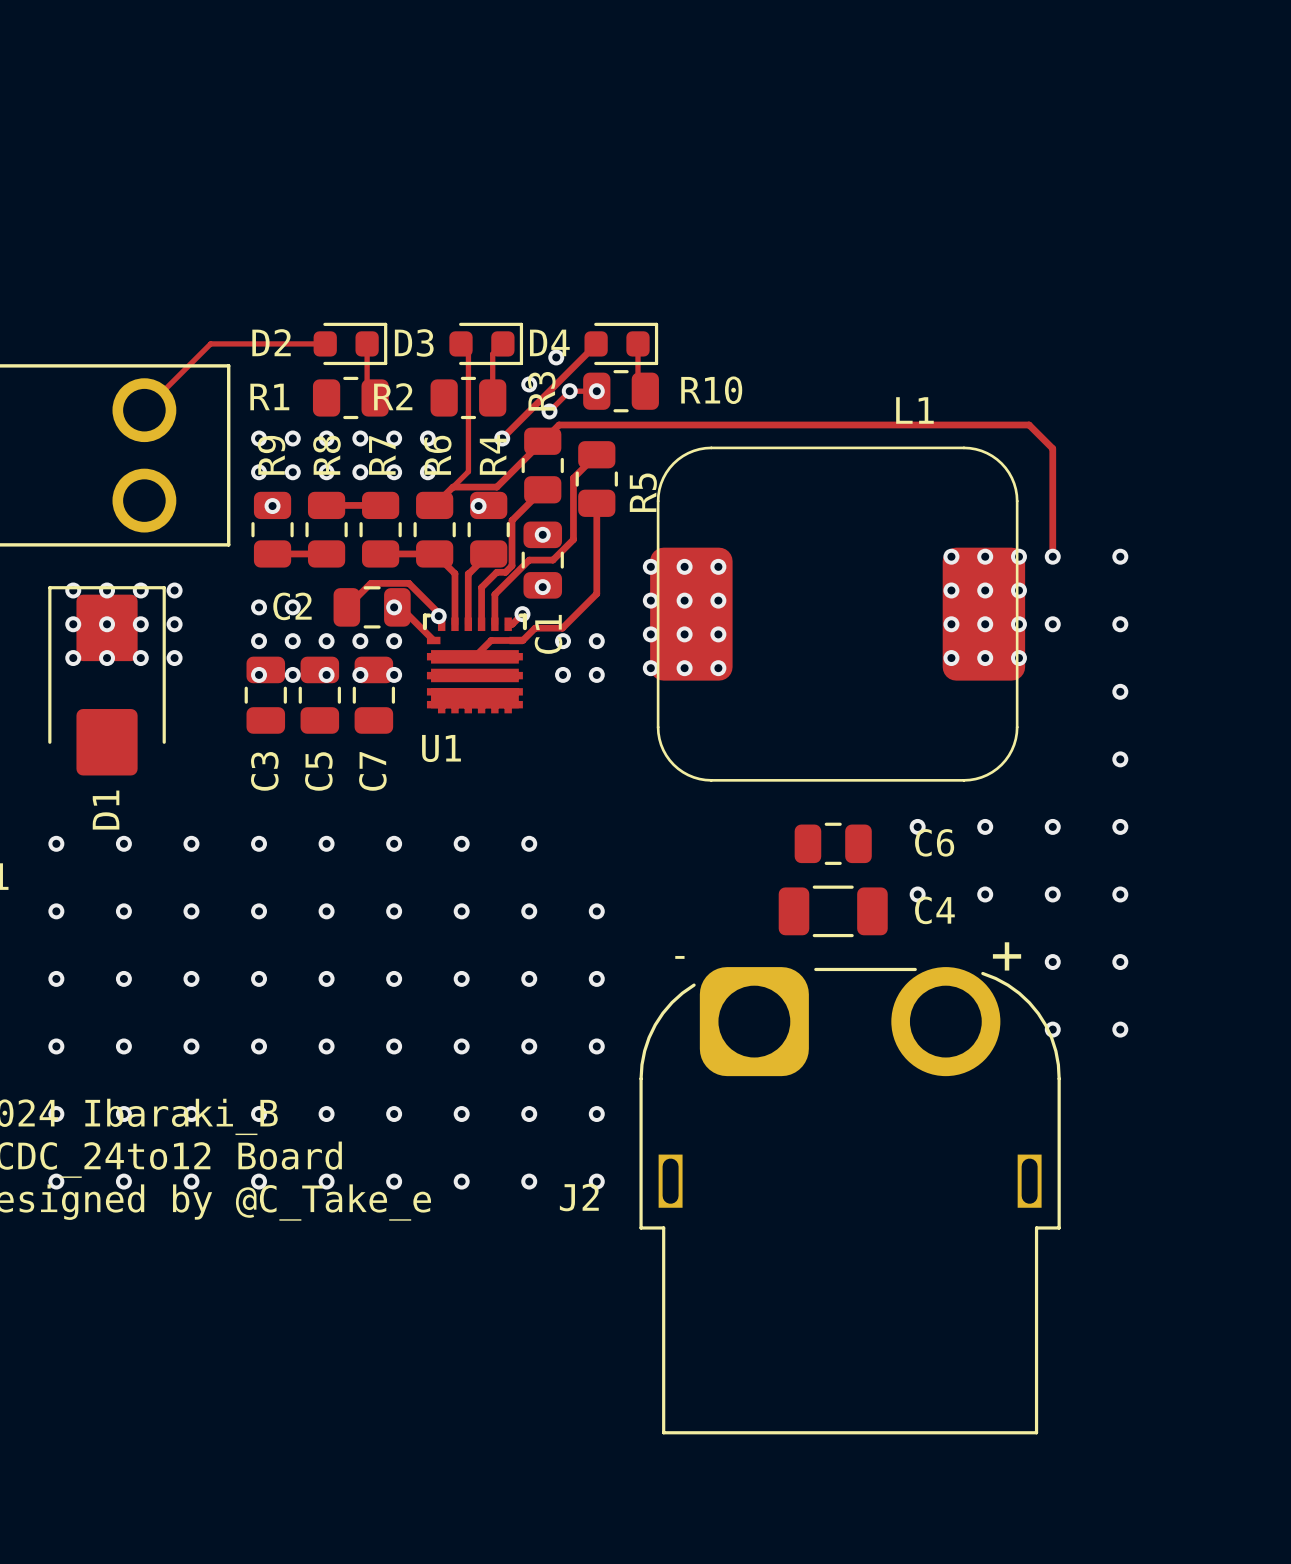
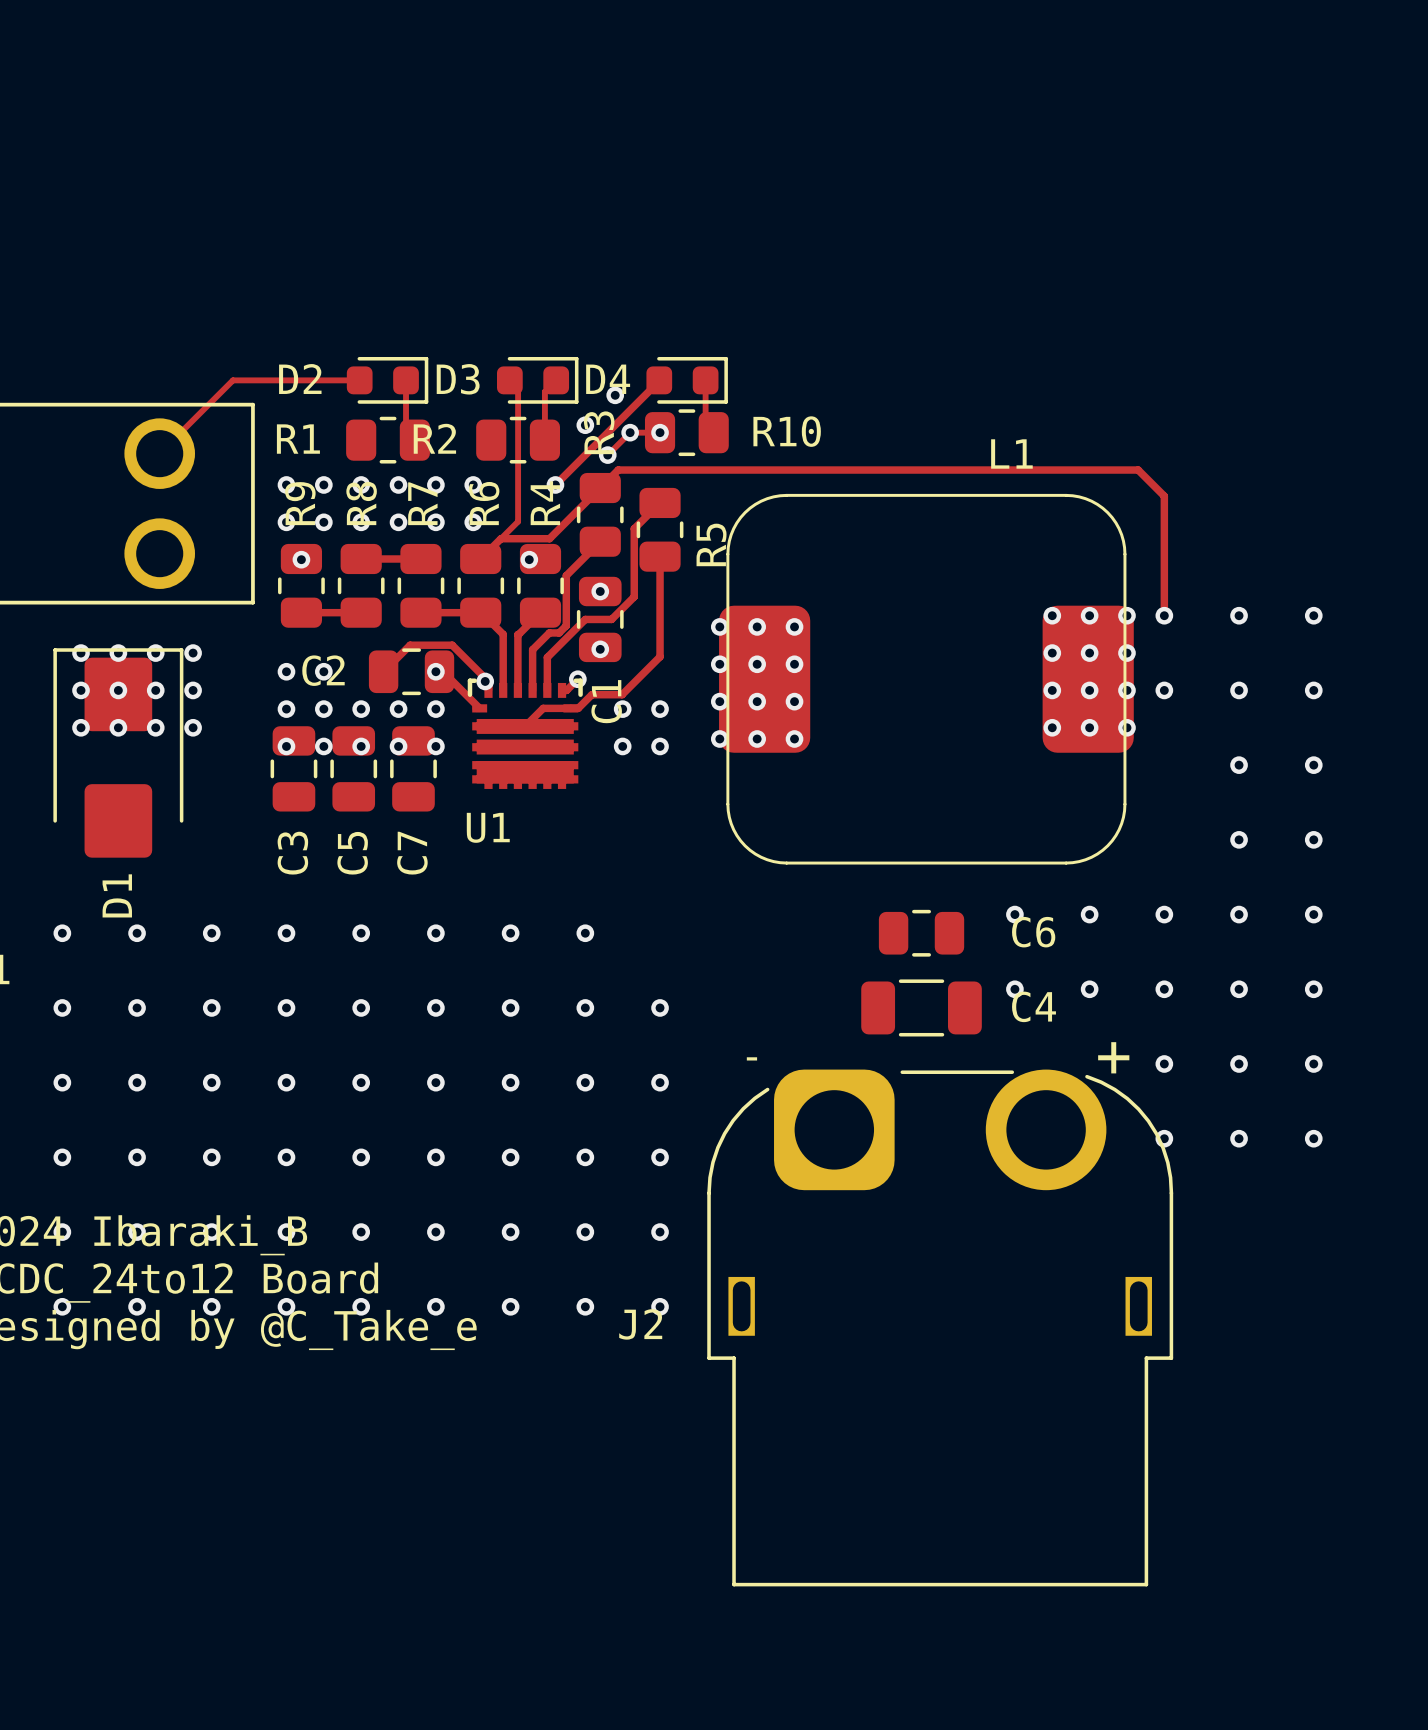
via: none -> (1313, 615)
via: none -> (1313, 690)
via: none -> (1313, 765)
via: none -> (1313, 839)
via: none -> (1313, 914)
via: none -> (1313, 989)
via: none -> (1313, 1063)
via: none -> (1313, 1138)

